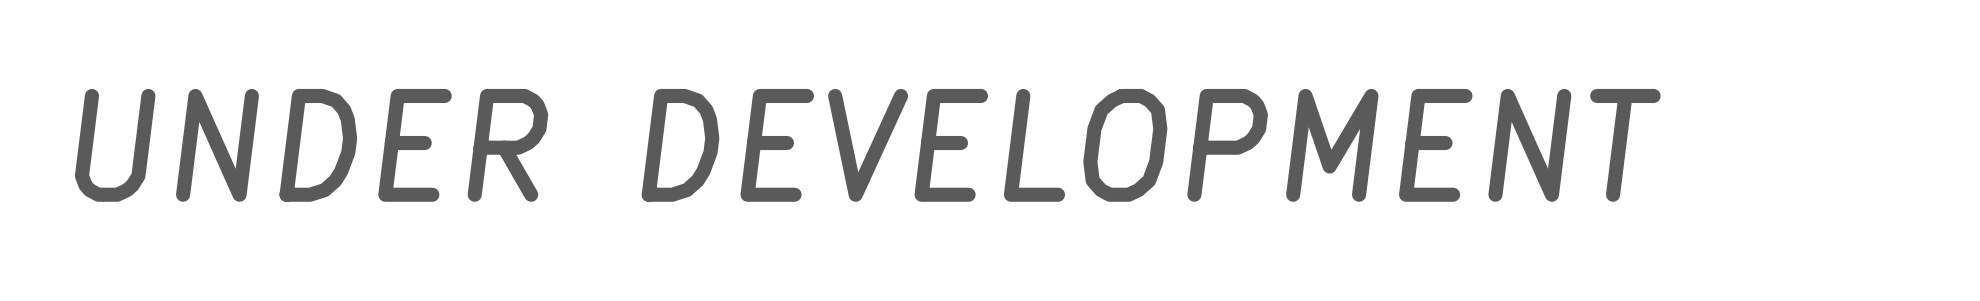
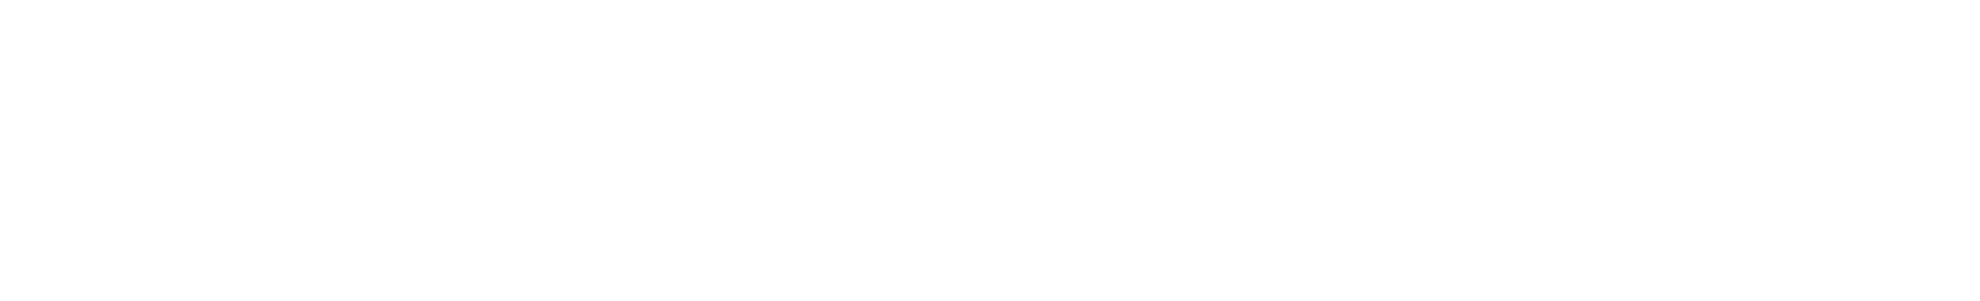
text: UNDER DEVELOPMENT (867, 145) -> none

